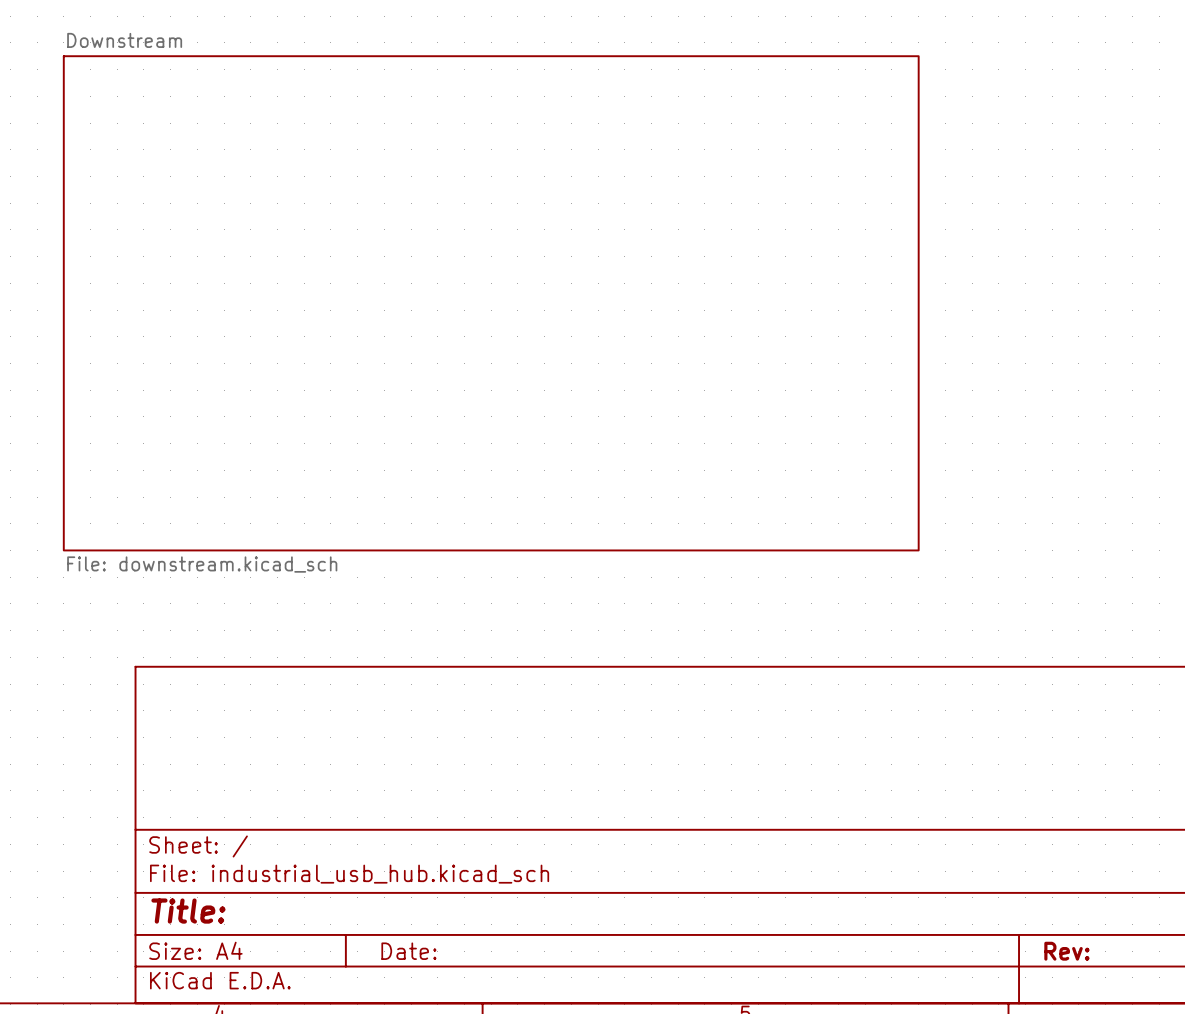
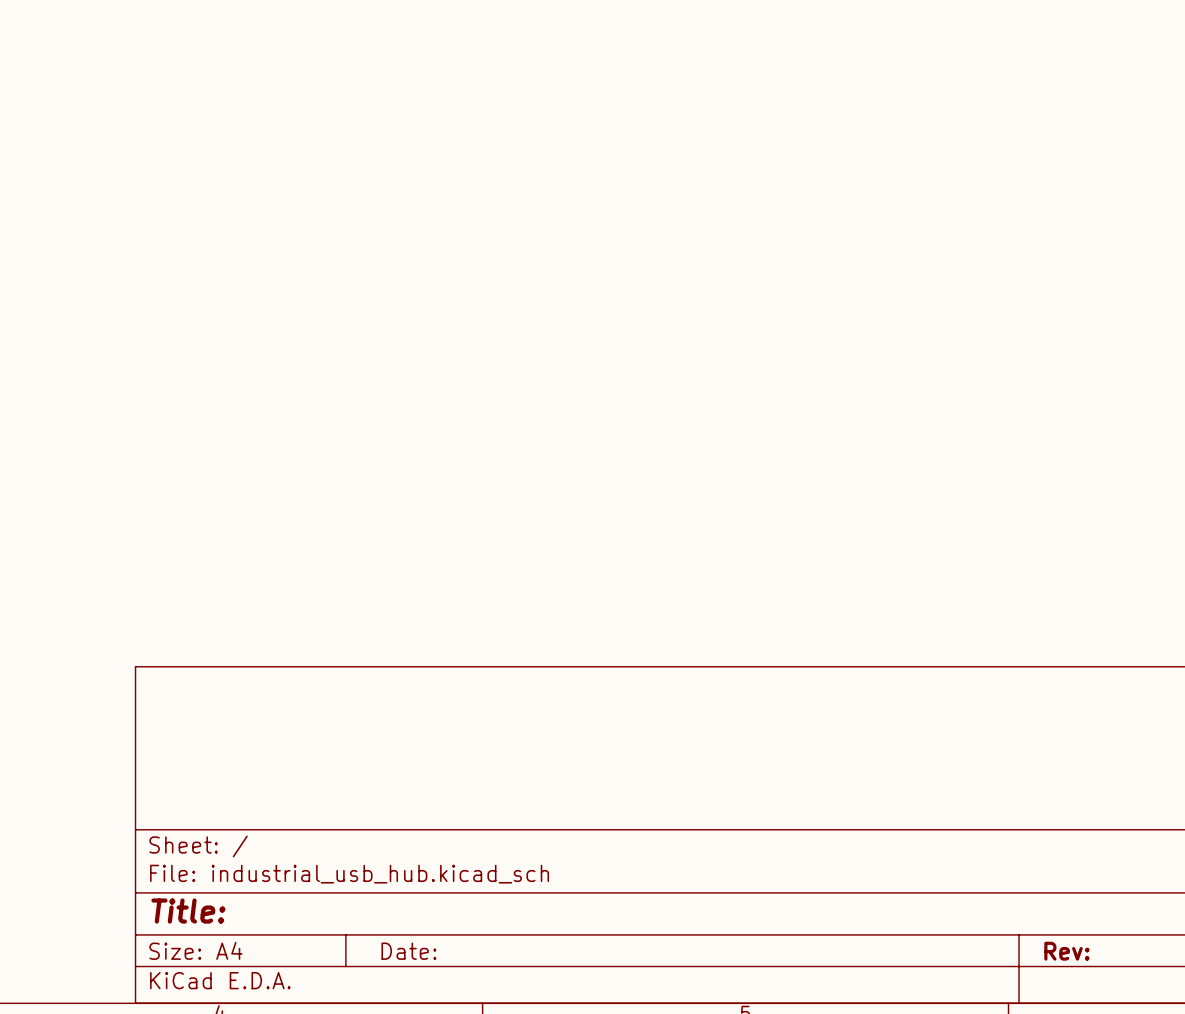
sheet Downstream: File: downstream.kicad_sch (491, 303) -> none

